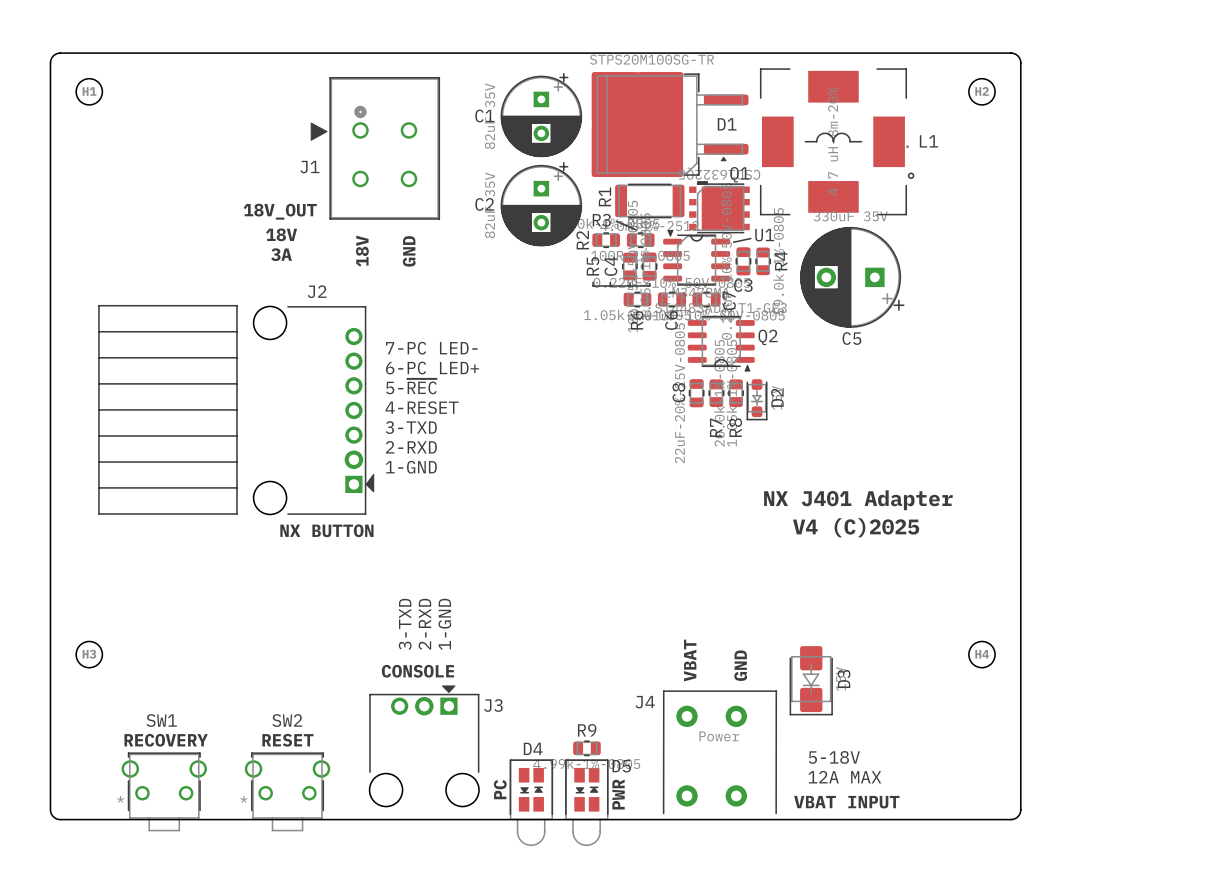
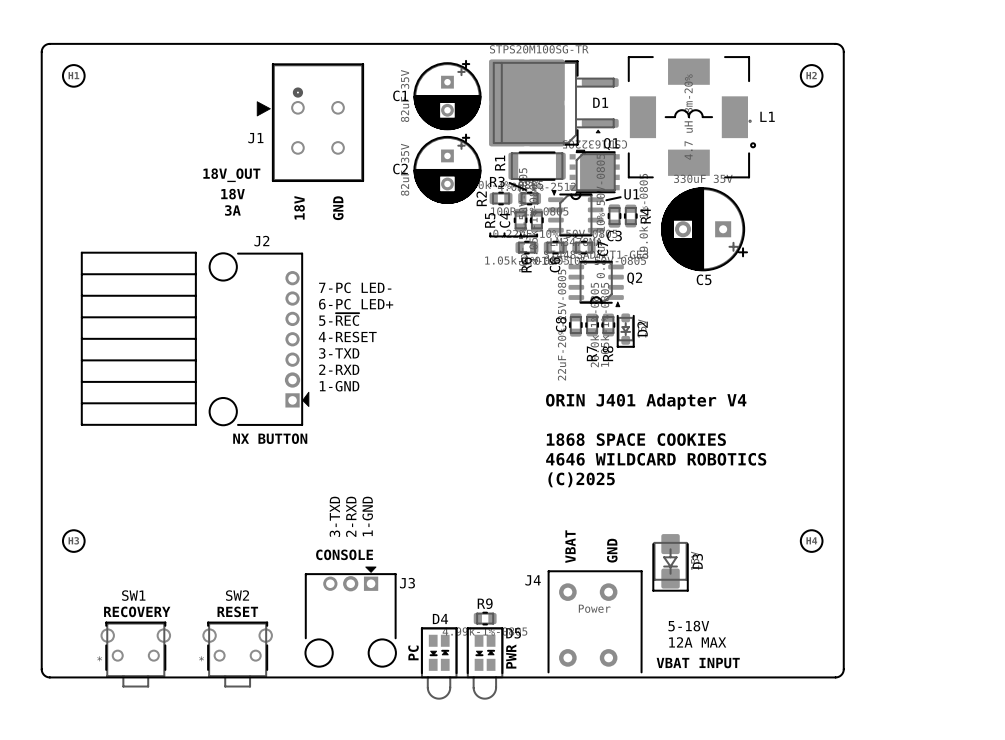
text: NX J401 Adapter (858, 500) -> ORIN J401 Adapter V4 (646, 401)
text: V4 (C)2025 (856, 527) -> none
text: none -> 1868 SPACE COOKIES (636, 439)
text: none -> 4646 WILDCARD ROBOTICS (656, 459)
text: none -> (C)2025 (581, 479)

